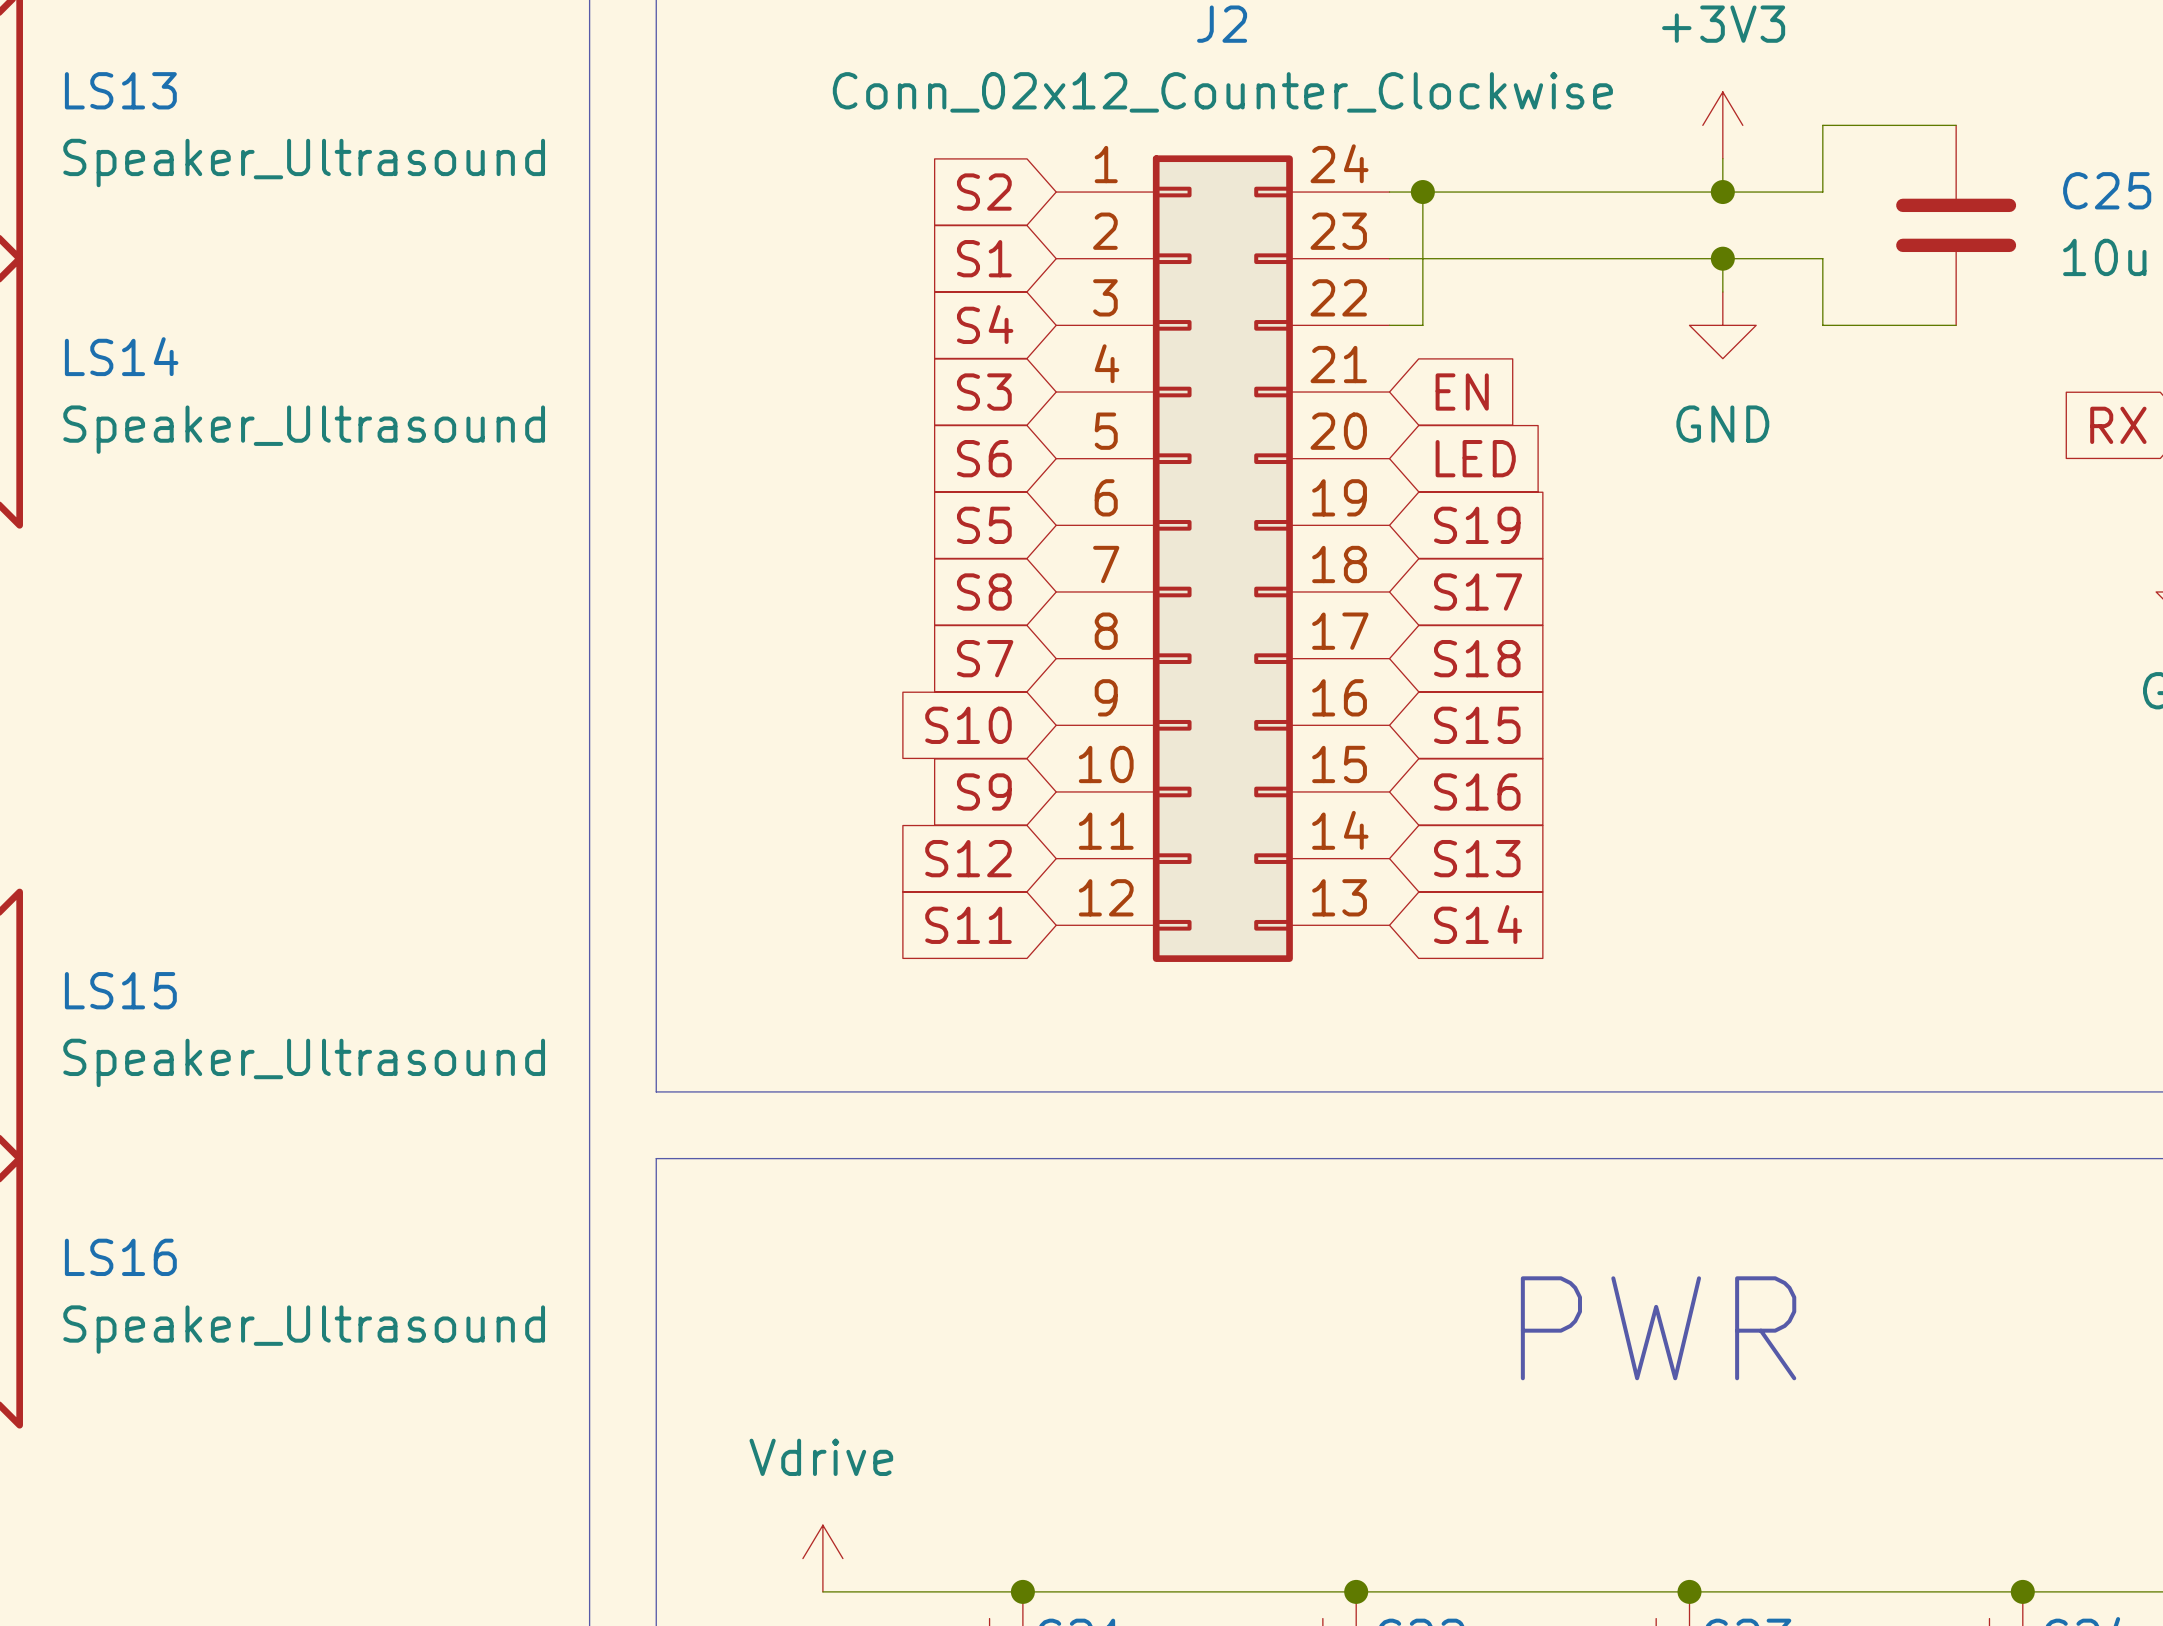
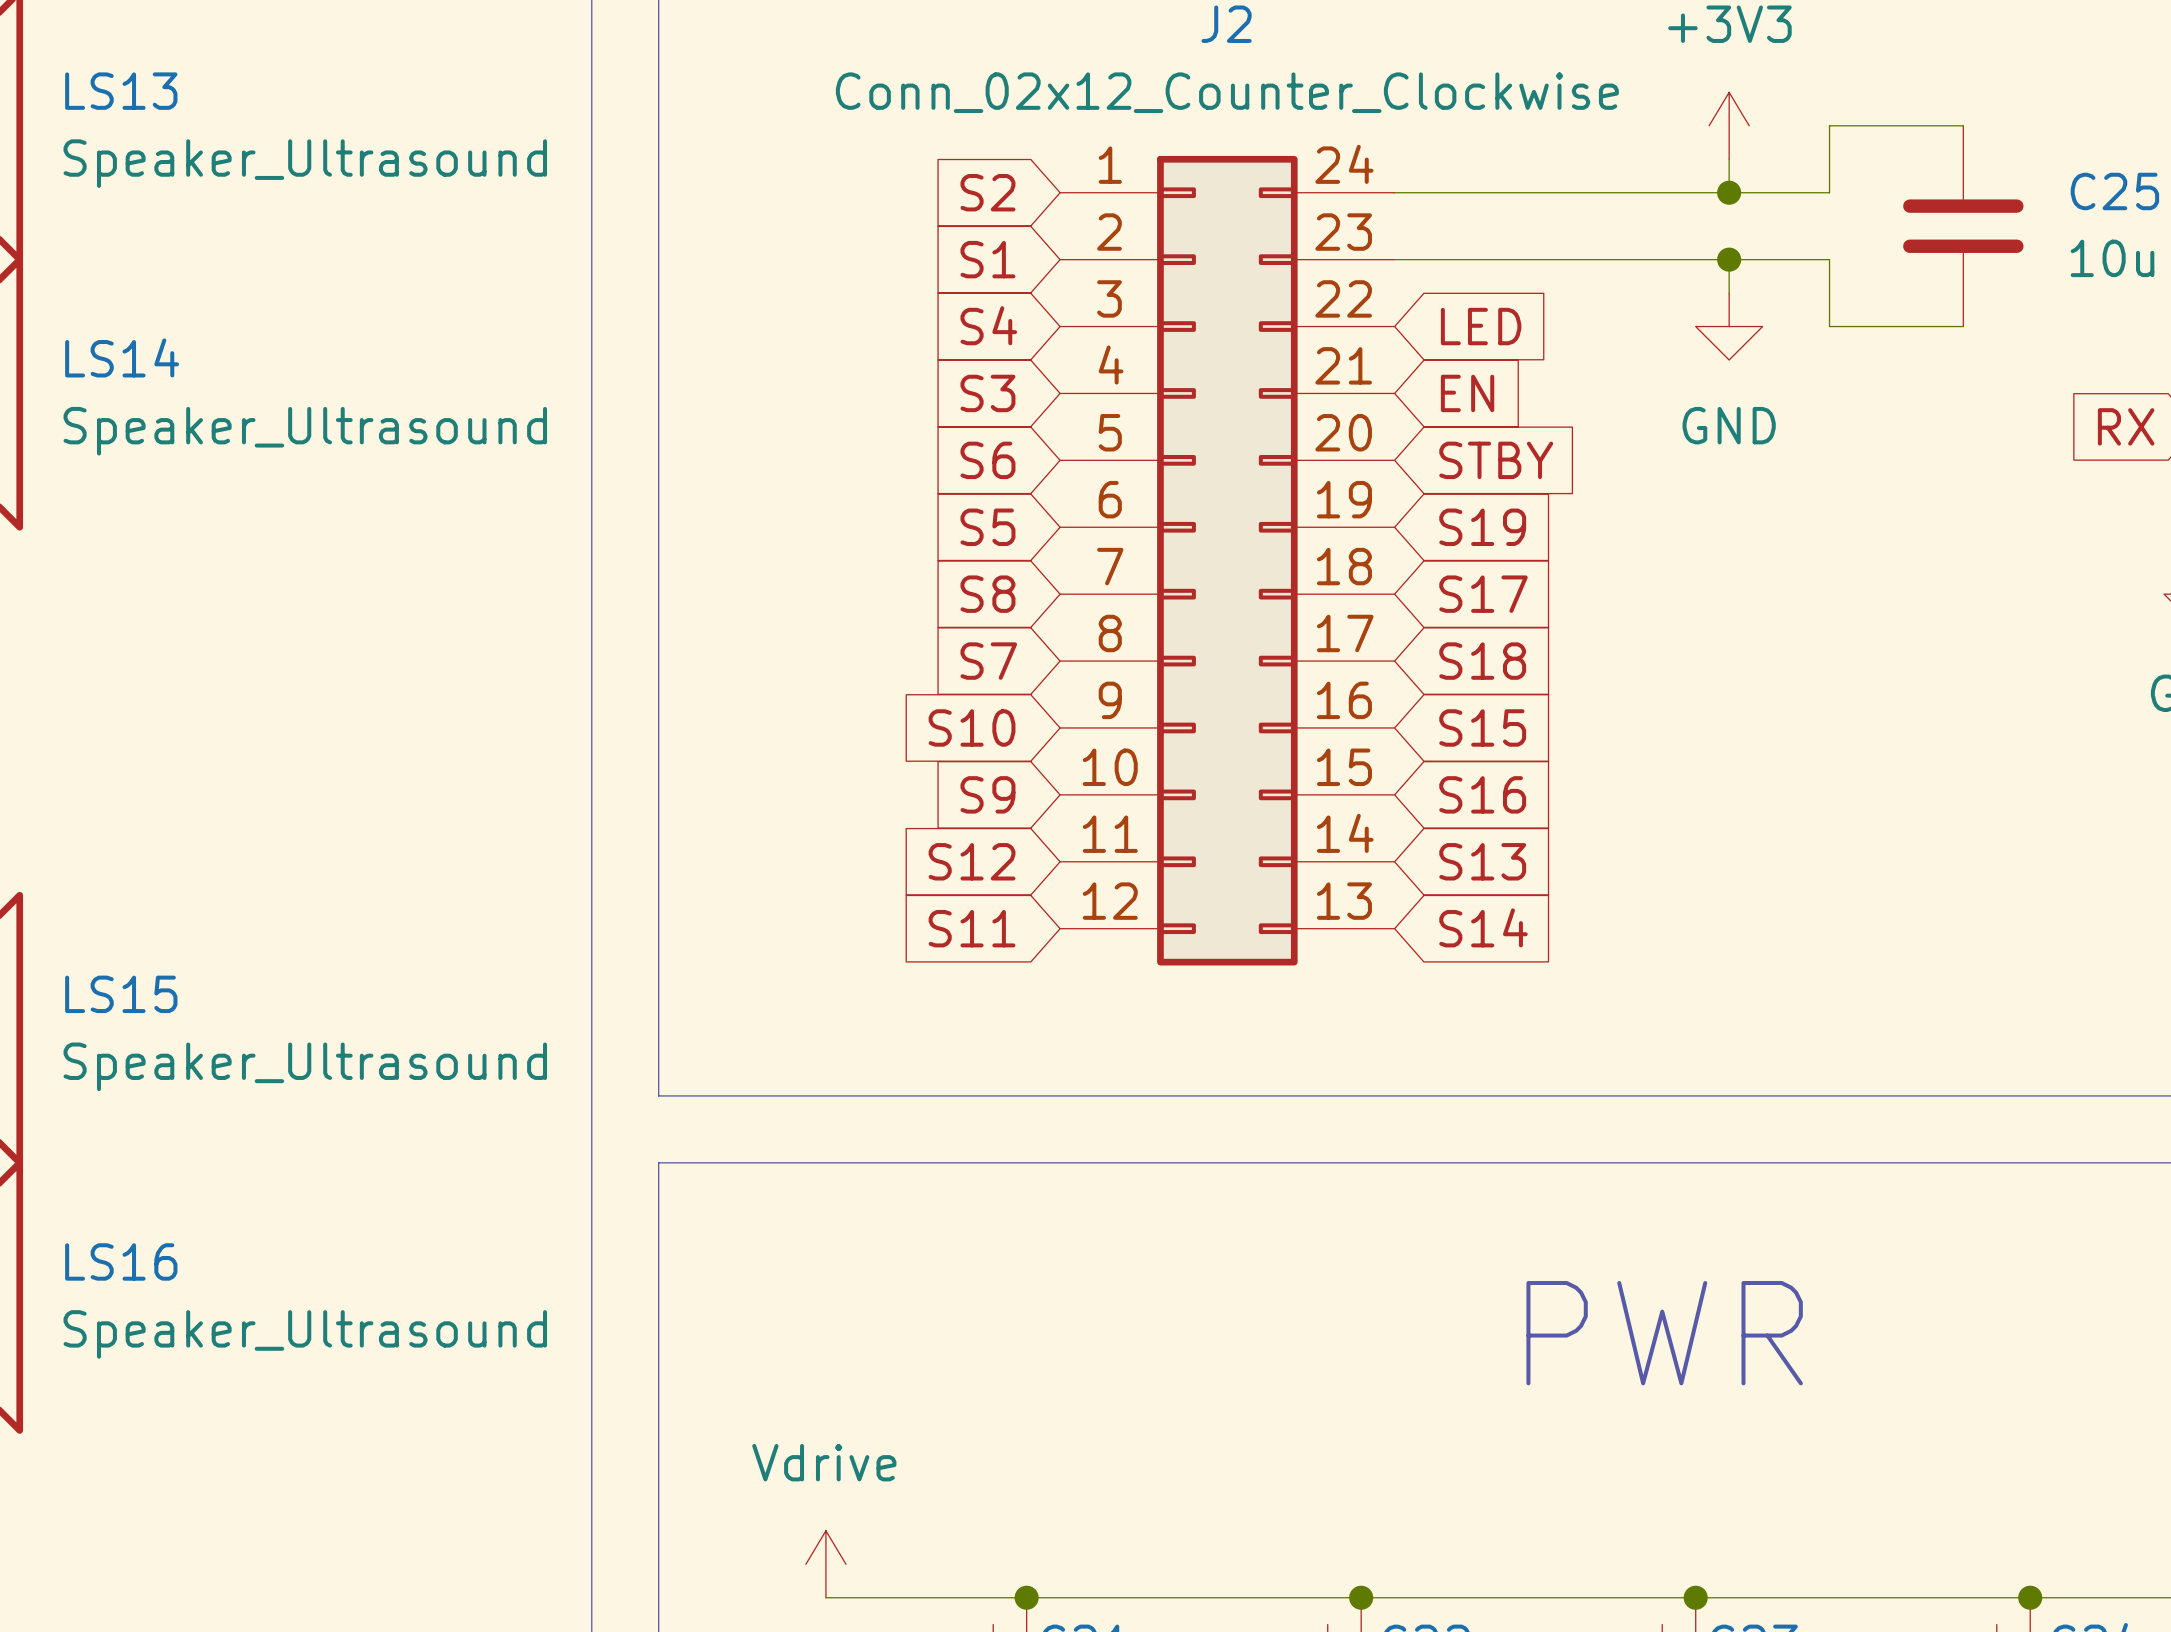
wire: (1422, 192) (1422, 325) (1389, 325) -> none
junction: (1422, 192) -> none
global label: none -> LED (1481, 326)
global label: LED (1475, 458) -> STBY (1496, 460)

